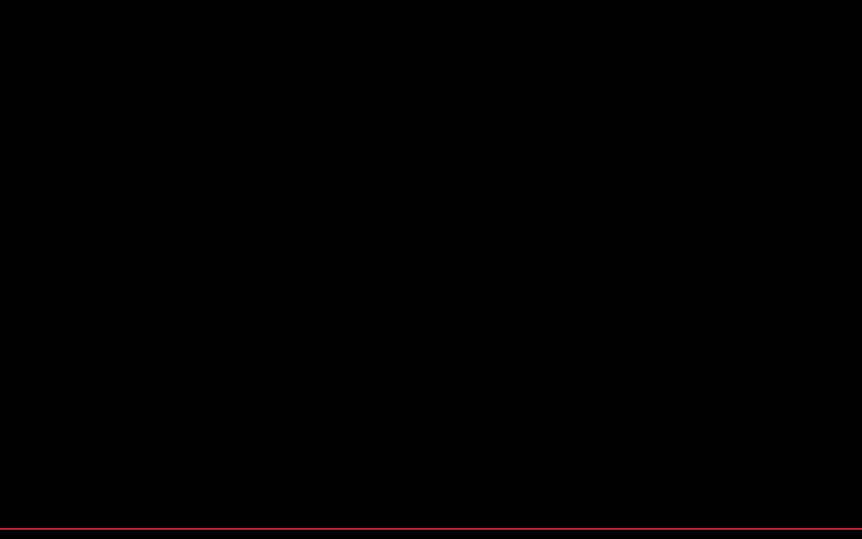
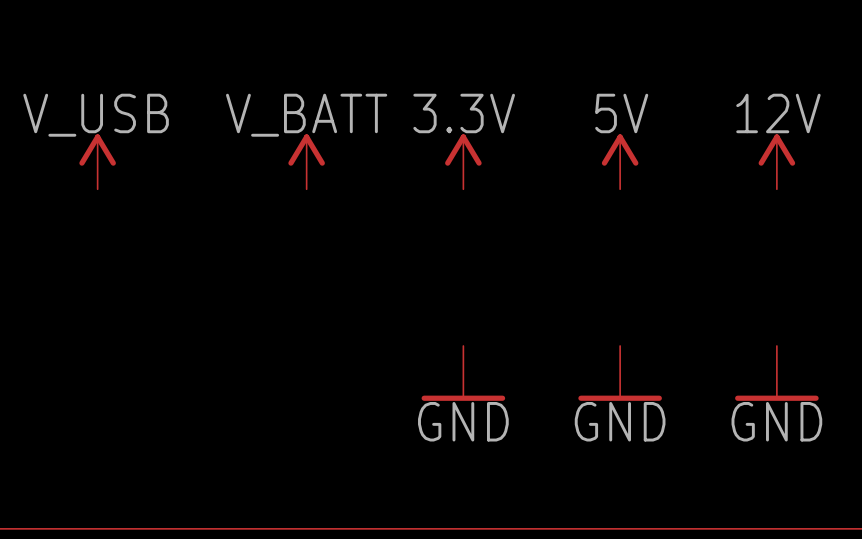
power symbol: none -> V_USB (97, 161)
power symbol: none -> V_BATT (306, 161)
power symbol: none -> 3.3V (463, 161)
power symbol: none -> 5V (620, 161)
power symbol: none -> 12V (776, 161)
power symbol: none -> GND (463, 373)
power symbol: none -> GND (620, 373)
power symbol: none -> GND (776, 373)

